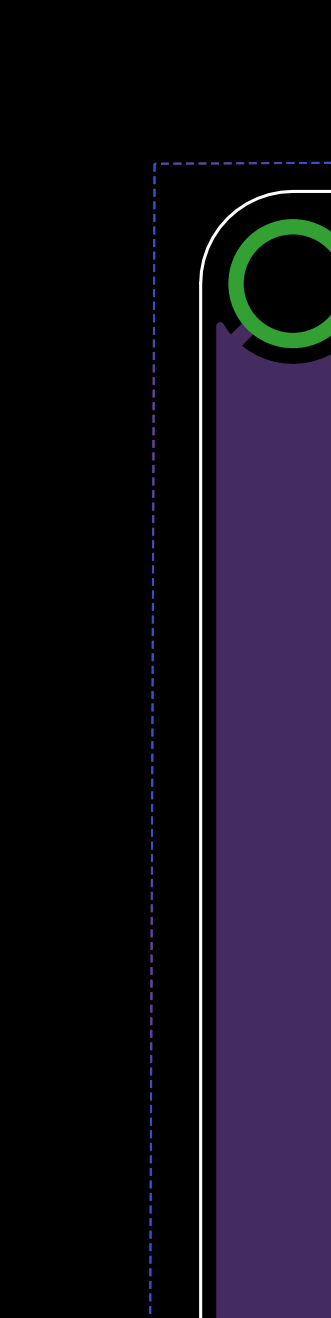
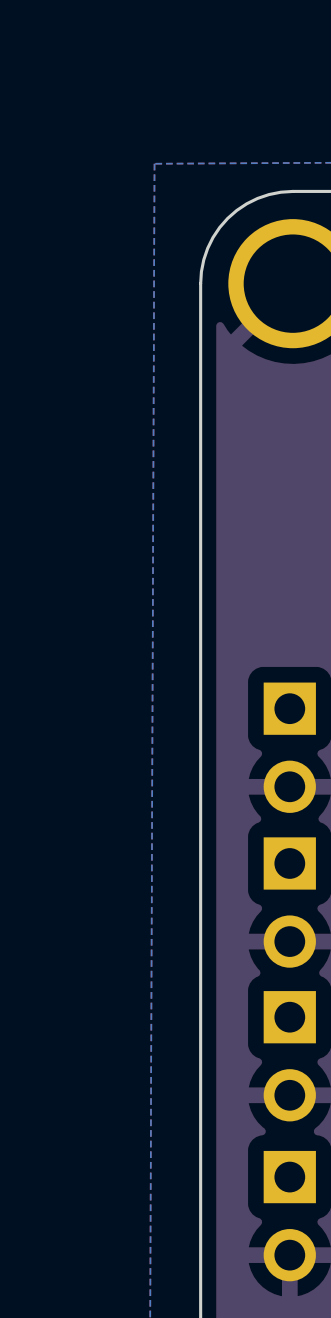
part: none -> (289, 747)
part: none -> (289, 902)
part: none -> (289, 1056)
part: none -> (289, 1216)

